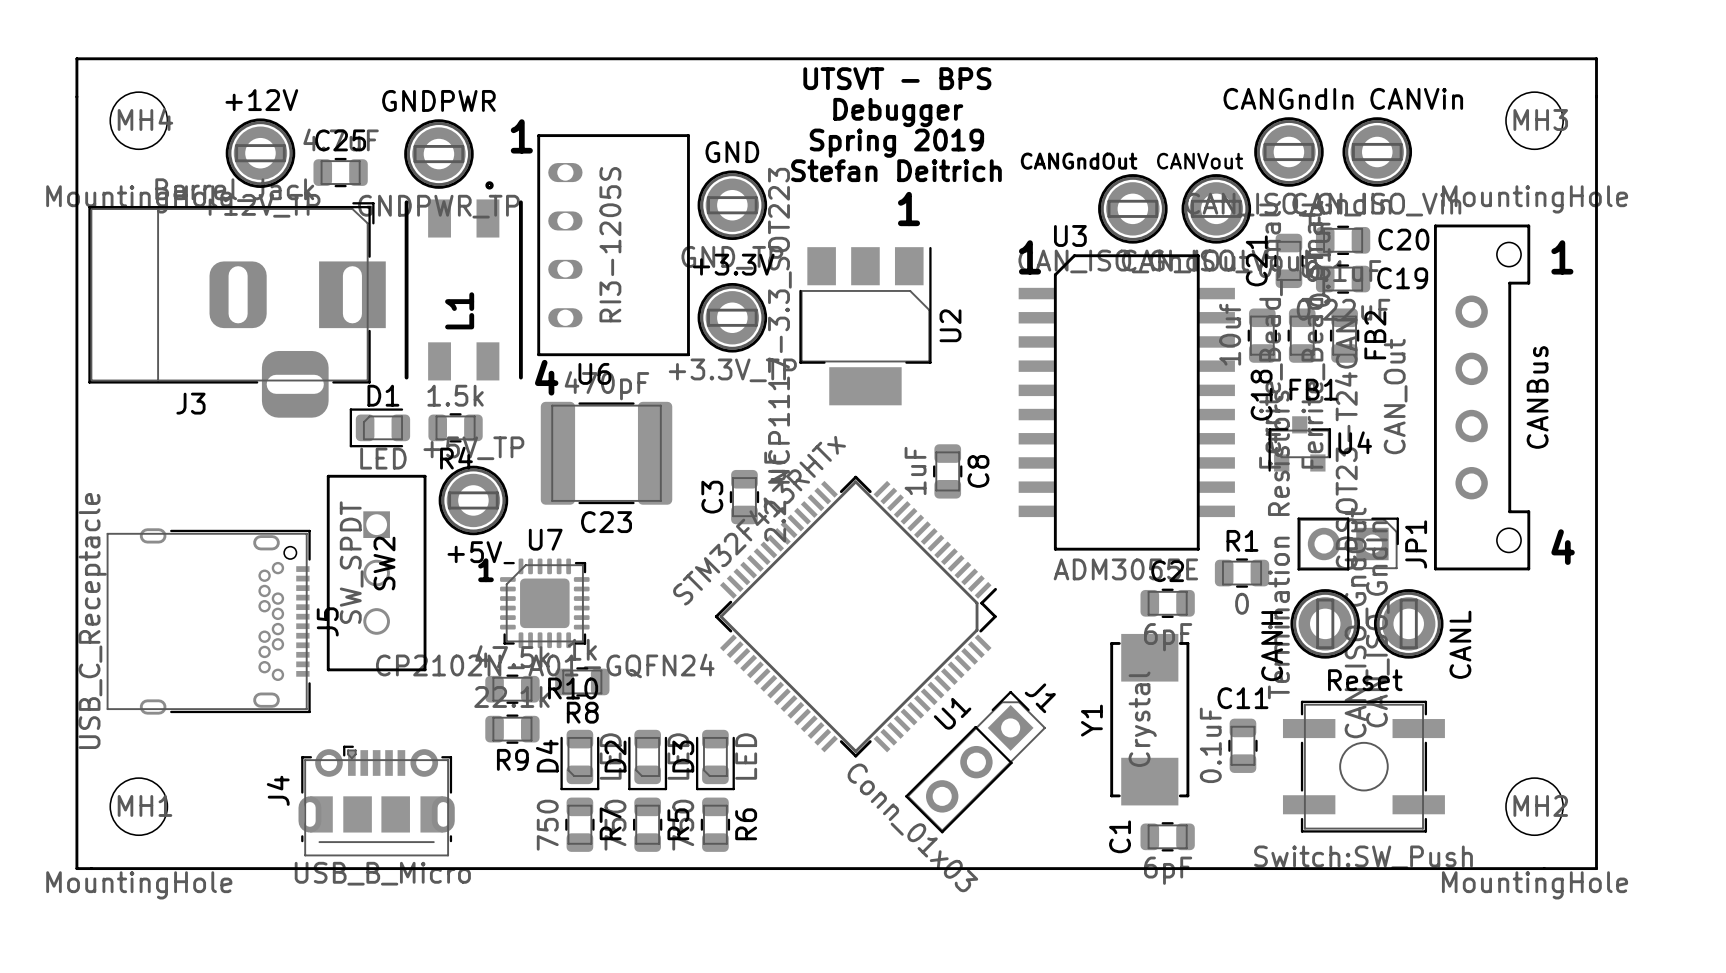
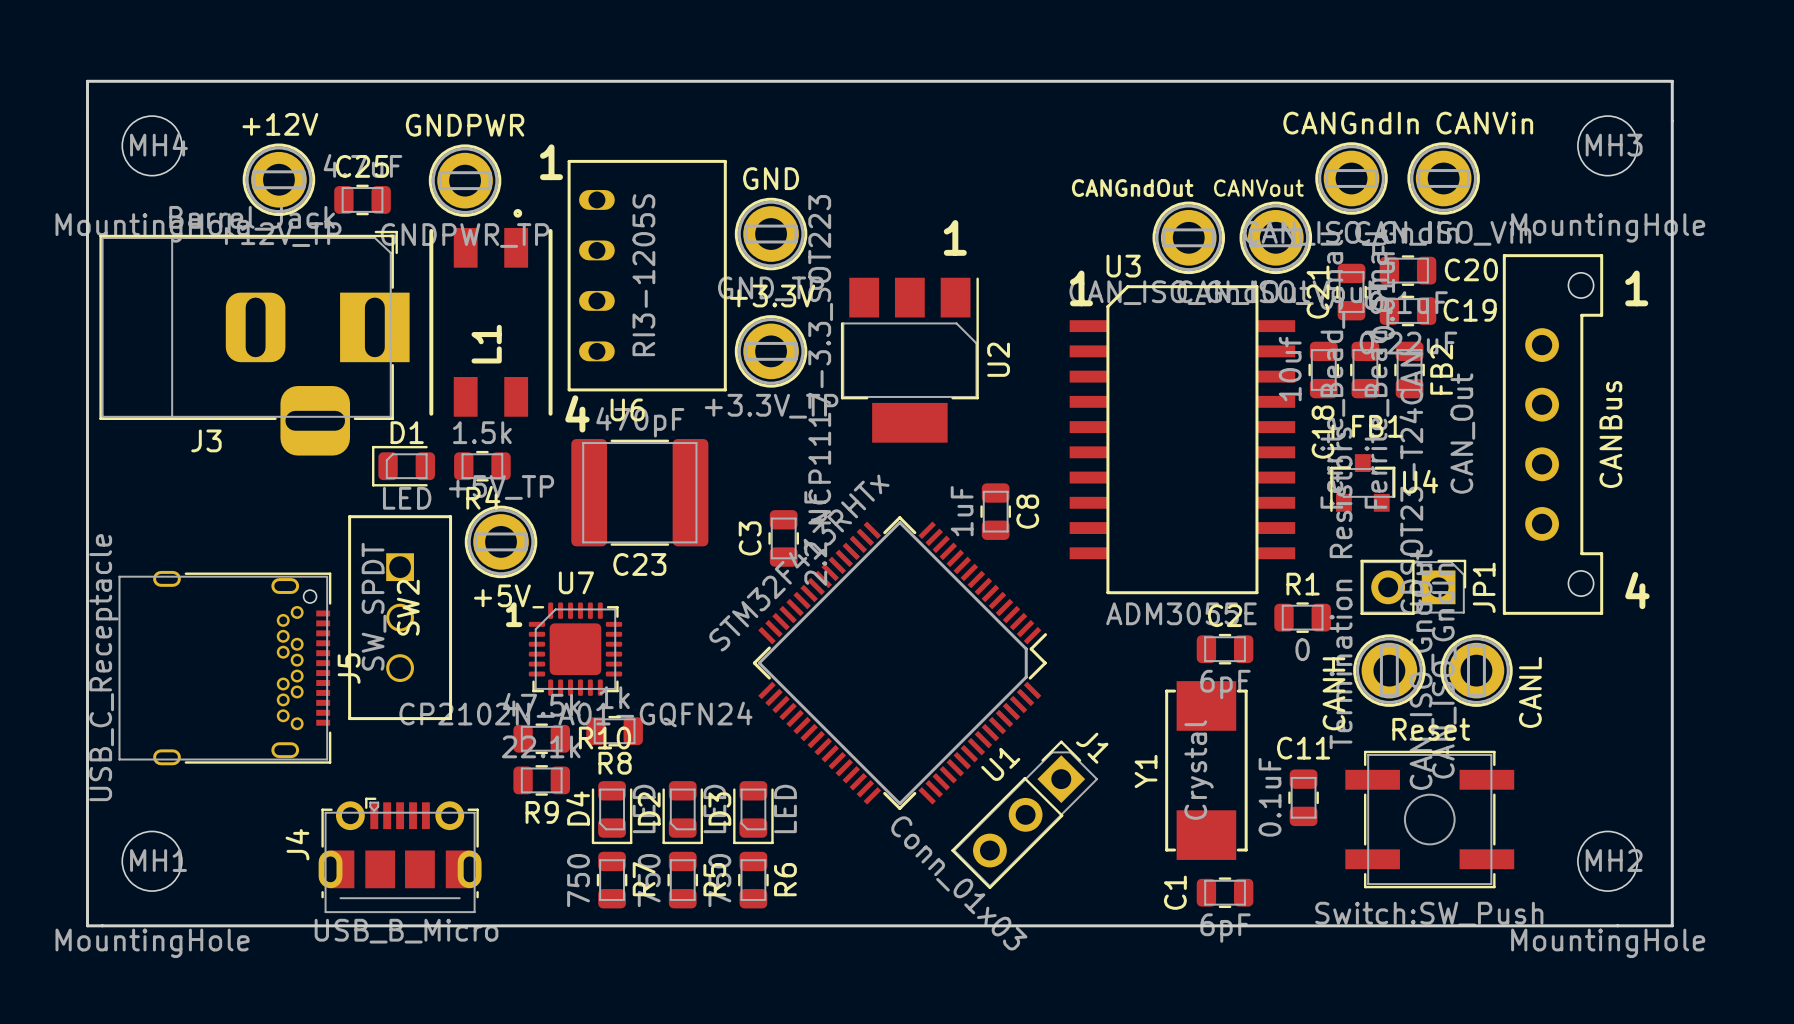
text: UTSVT - BPS (897, 78) -> none
text: Debugger (898, 112) -> none
text: Spring 2019 (896, 143) -> none
text: Stefan Deitrich (896, 170) -> none

